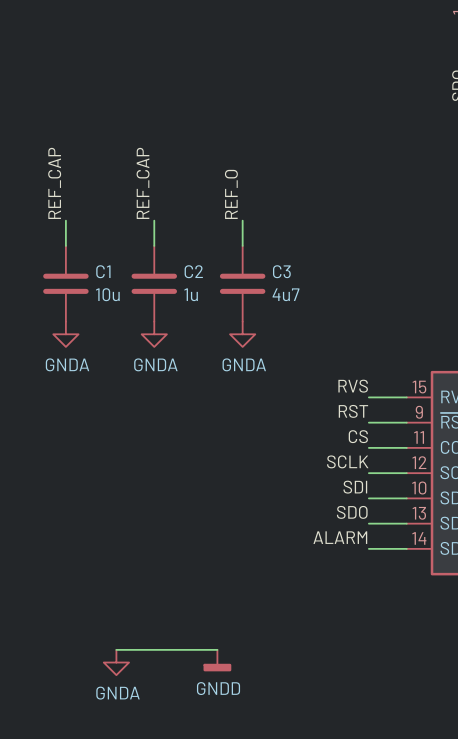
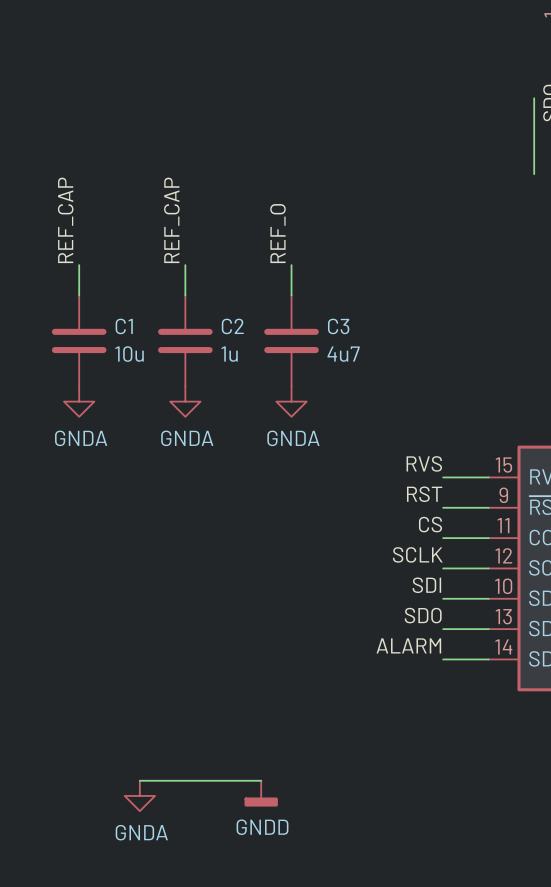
wire: none -> (534, 98) (534, 174)

